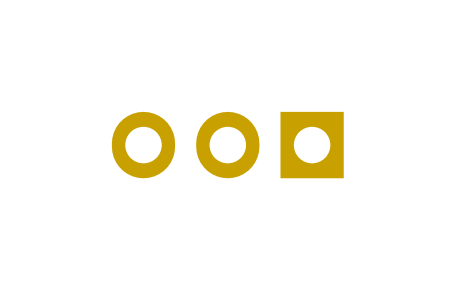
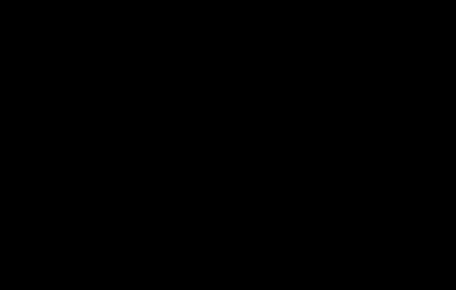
part: (227, 145) -> none

